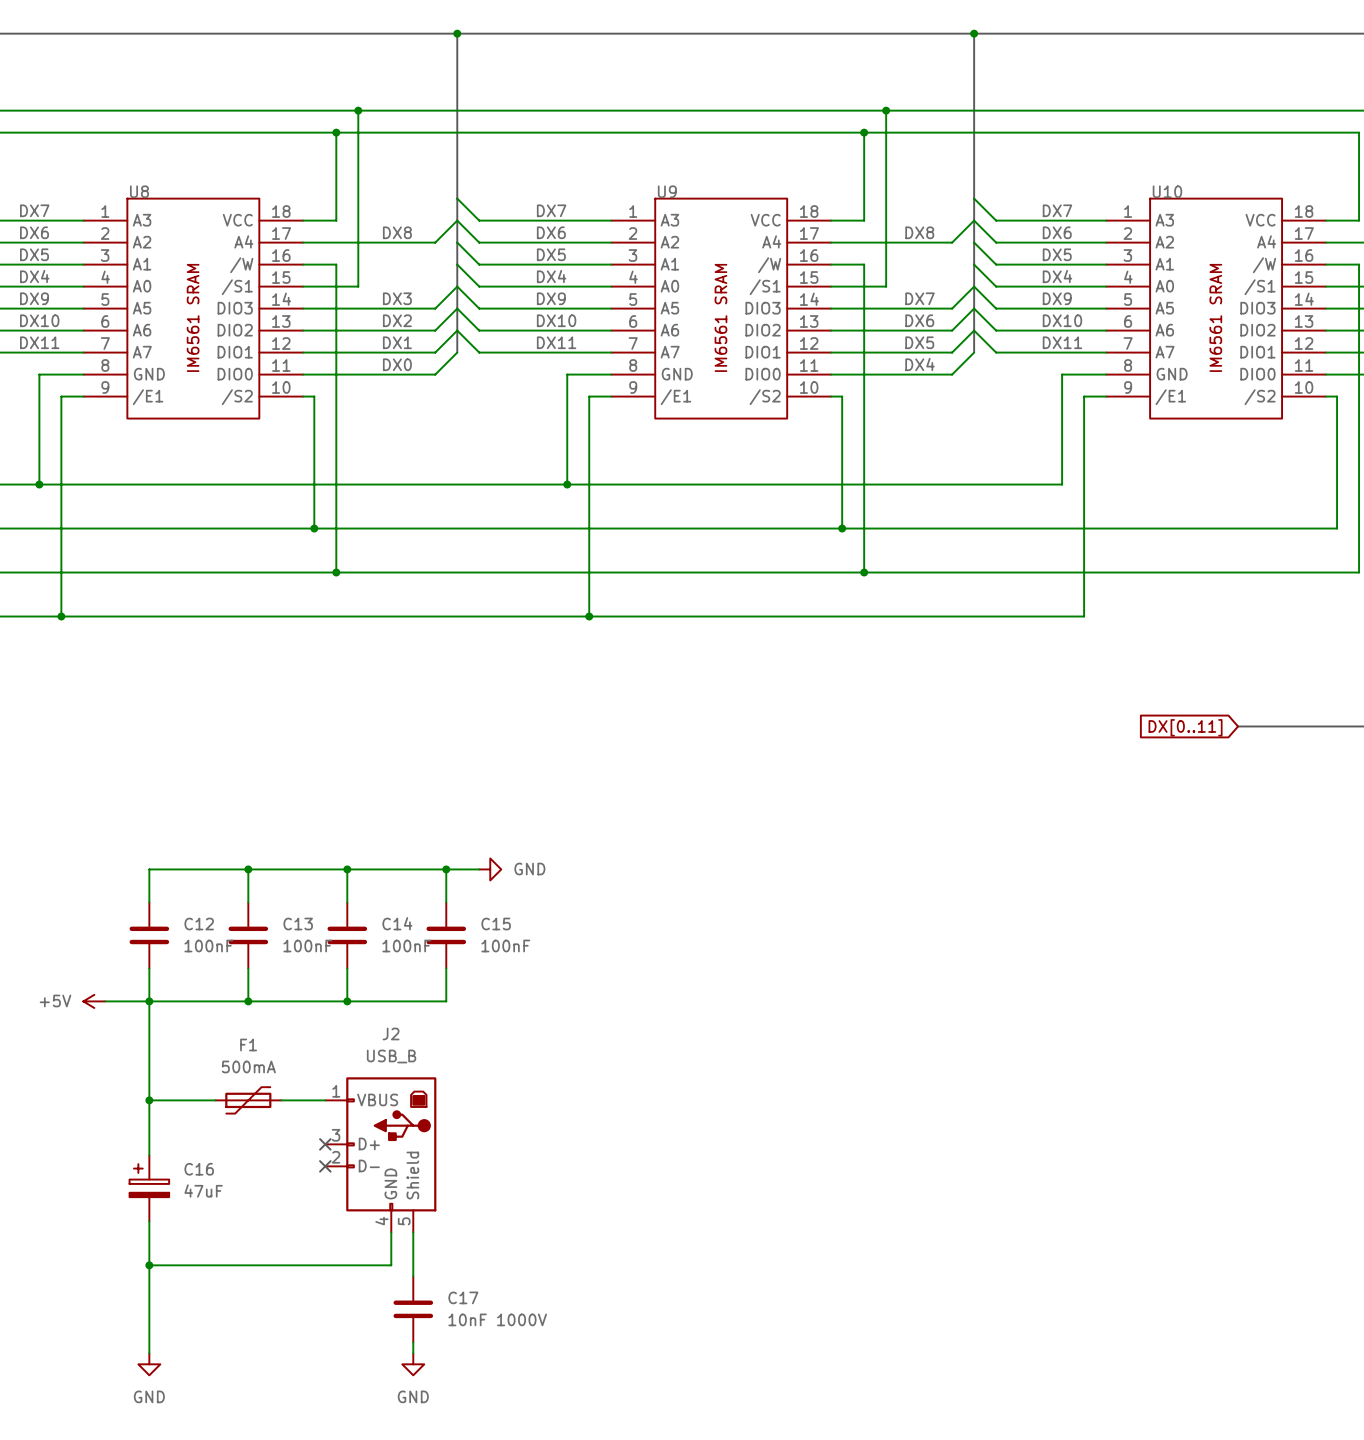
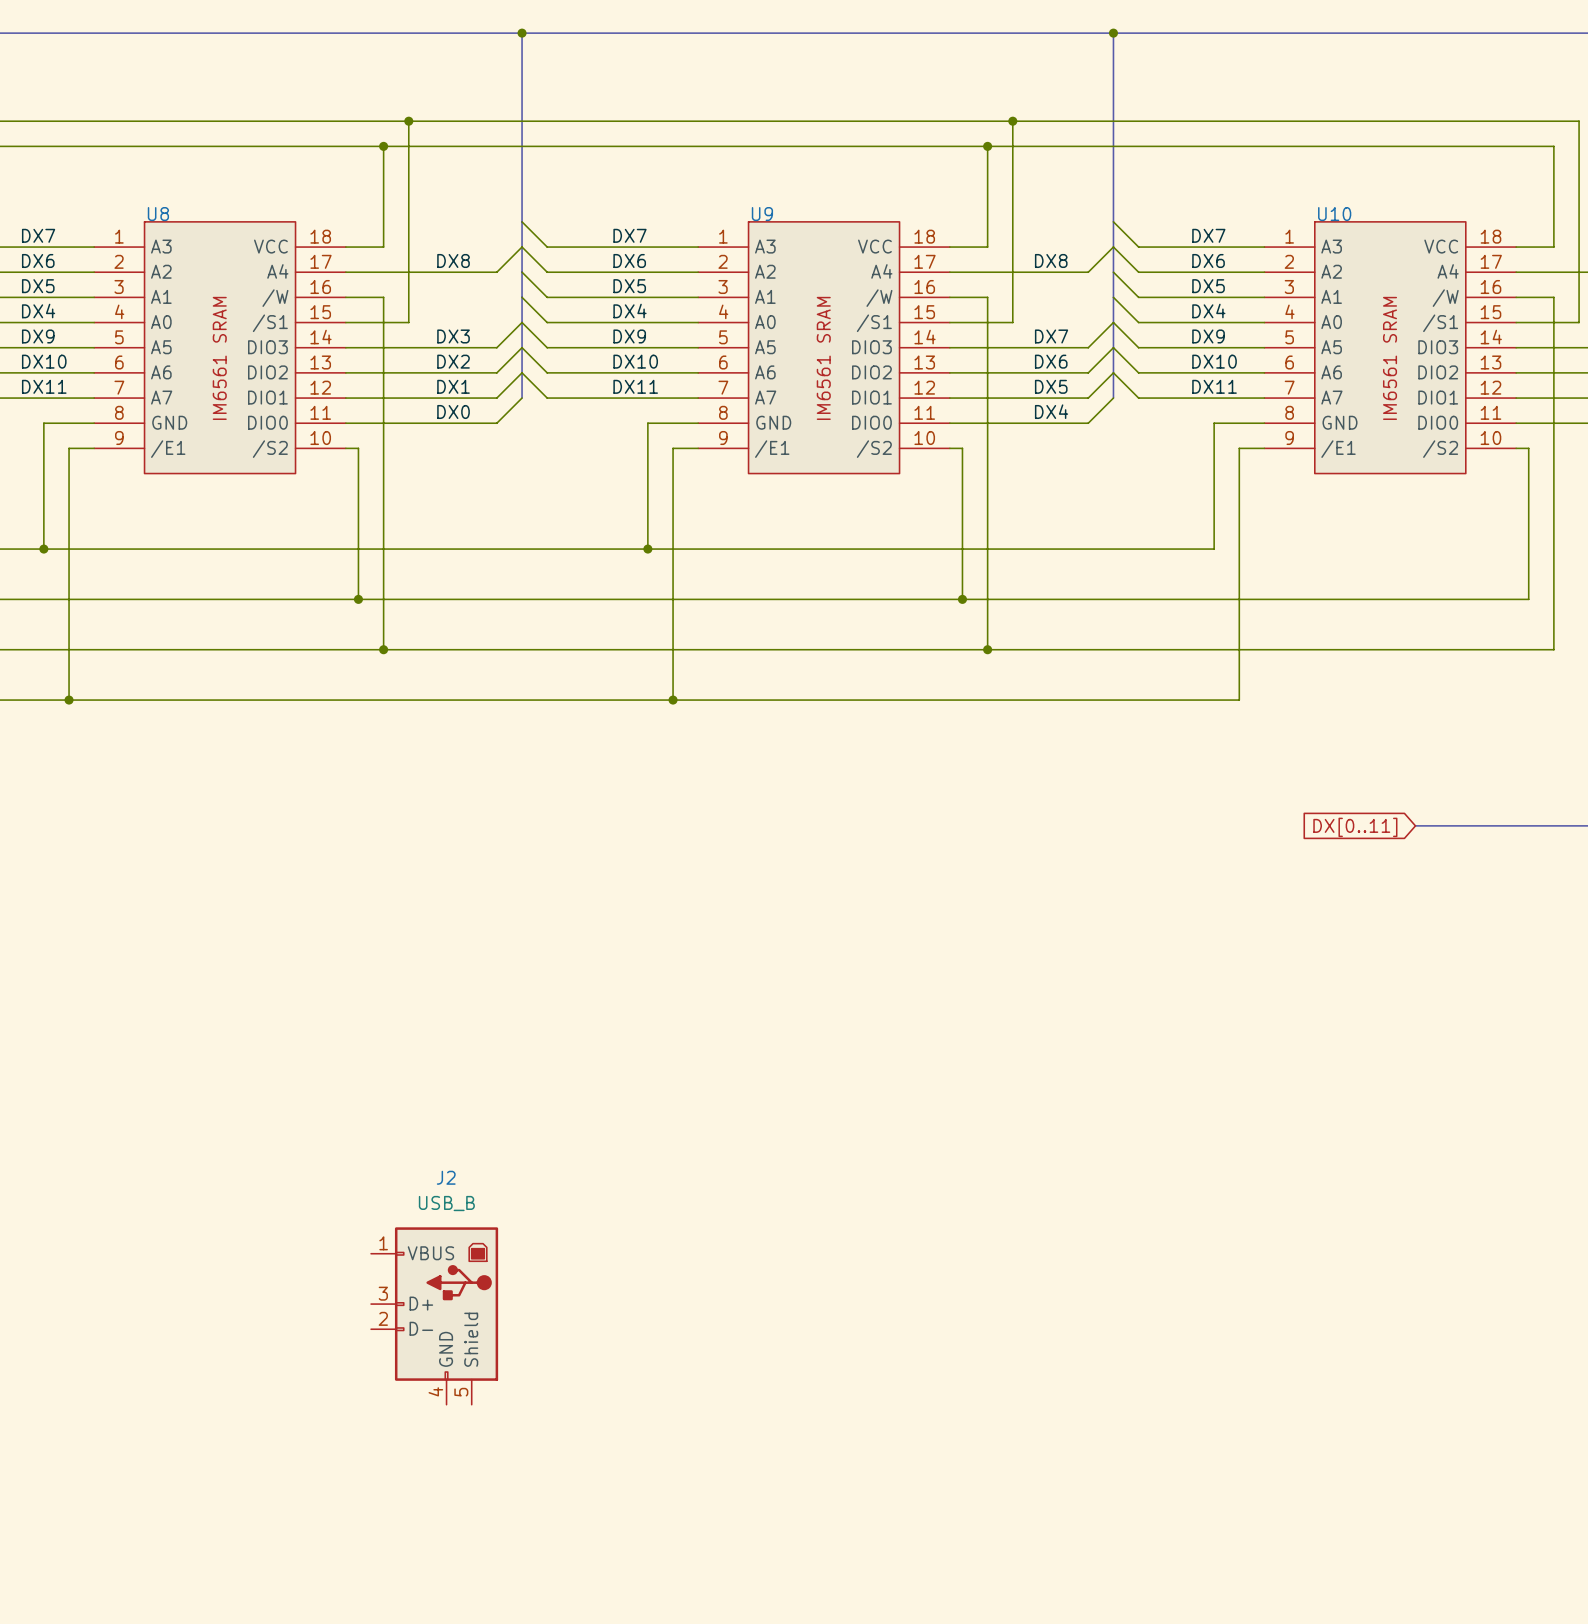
wire: (248, 869) (248, 902) -> none
junction: (248, 869) -> none
wire: (347, 869) (347, 902) -> none
junction: (347, 869) -> none
wire: (446, 869) (446, 902) -> none
junction: (446, 869) -> none
wire: (479, 869) (149, 869) (149, 902) -> none
power symbol: GND (490, 869) -> none
C12: 100nF (149, 935) -> none
C13: 100nF (248, 935) -> none
C14: 100nF (347, 935) -> none
C15: 100nF (446, 935) -> none
wire: (149, 968) (149, 1155) -> none
wire: (248, 968) (248, 1001) -> none
wire: (347, 968) (347, 1001) -> none
wire: (446, 968) (446, 1001) (105, 1001) -> none
power symbol: +5V (94, 1001) -> none
junction: (149, 1001) -> none
junction: (248, 1001) -> none
junction: (347, 1001) -> none
wire: (149, 1100) (215, 1100) -> none
junction: (149, 1100) -> none
F1: 500mA (248, 1100) -> none
wire: (281, 1100) (325, 1100) -> none
no-connect mark: (325, 1144) -> none
no-connect mark: (325, 1166) -> none
C16: 47uF (149, 1188) -> none
wire: (149, 1221) (149, 1353) -> none
wire: (391, 1232) (391, 1265) (149, 1265) -> none
wire: (413, 1232) (413, 1276) -> none
junction: (149, 1265) -> none
C17: 10nF 1000V (413, 1309) -> none
wire: (413, 1342) (413, 1353) -> none
power symbol: GND (149, 1364) -> none
power symbol: GND (413, 1364) -> none

